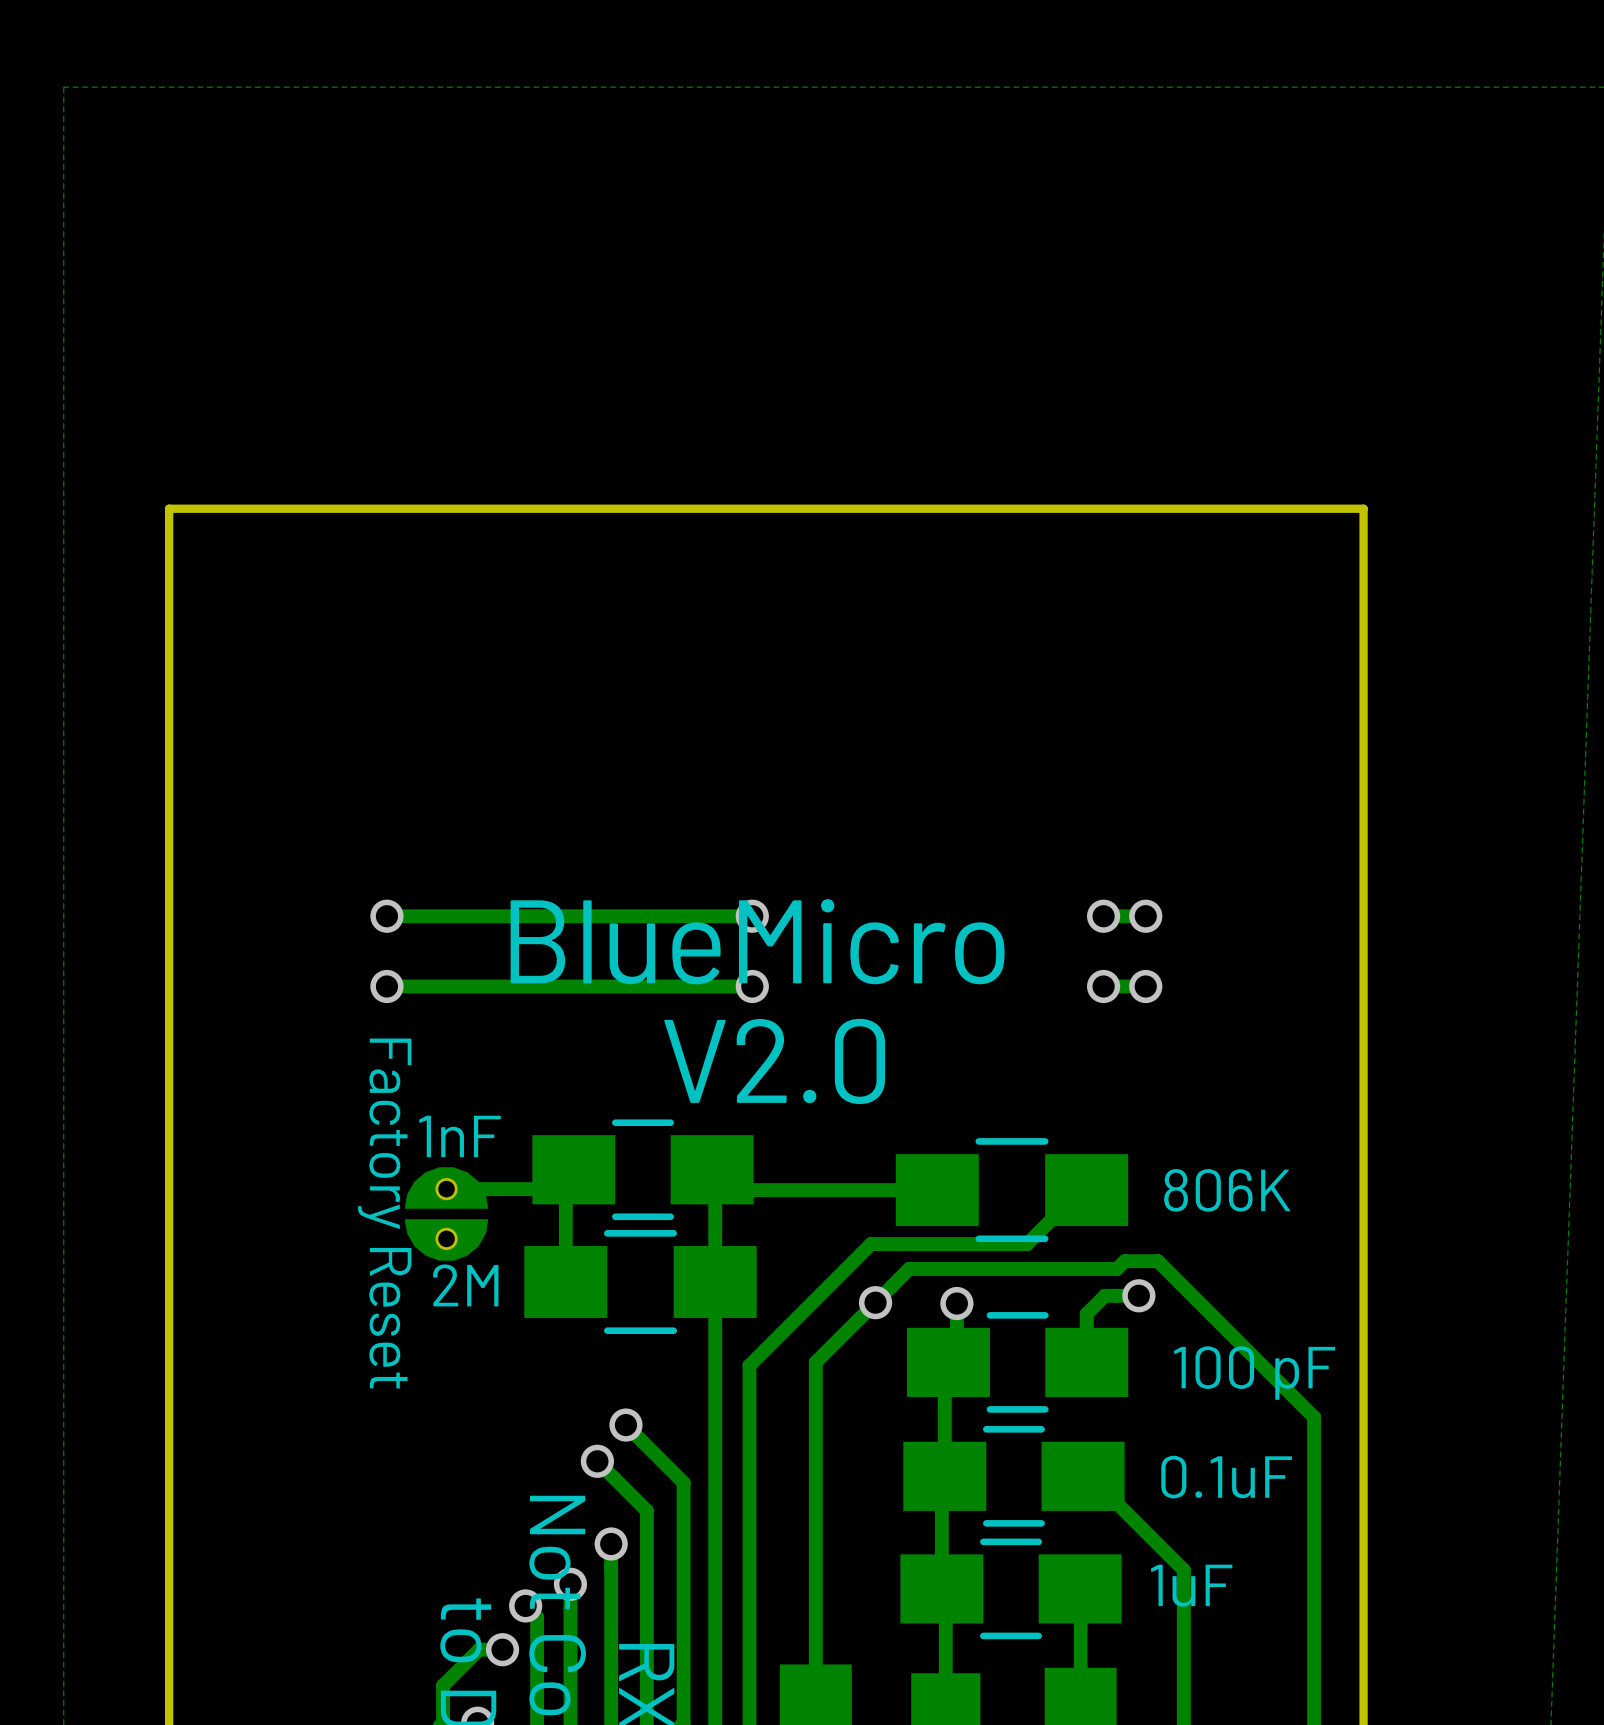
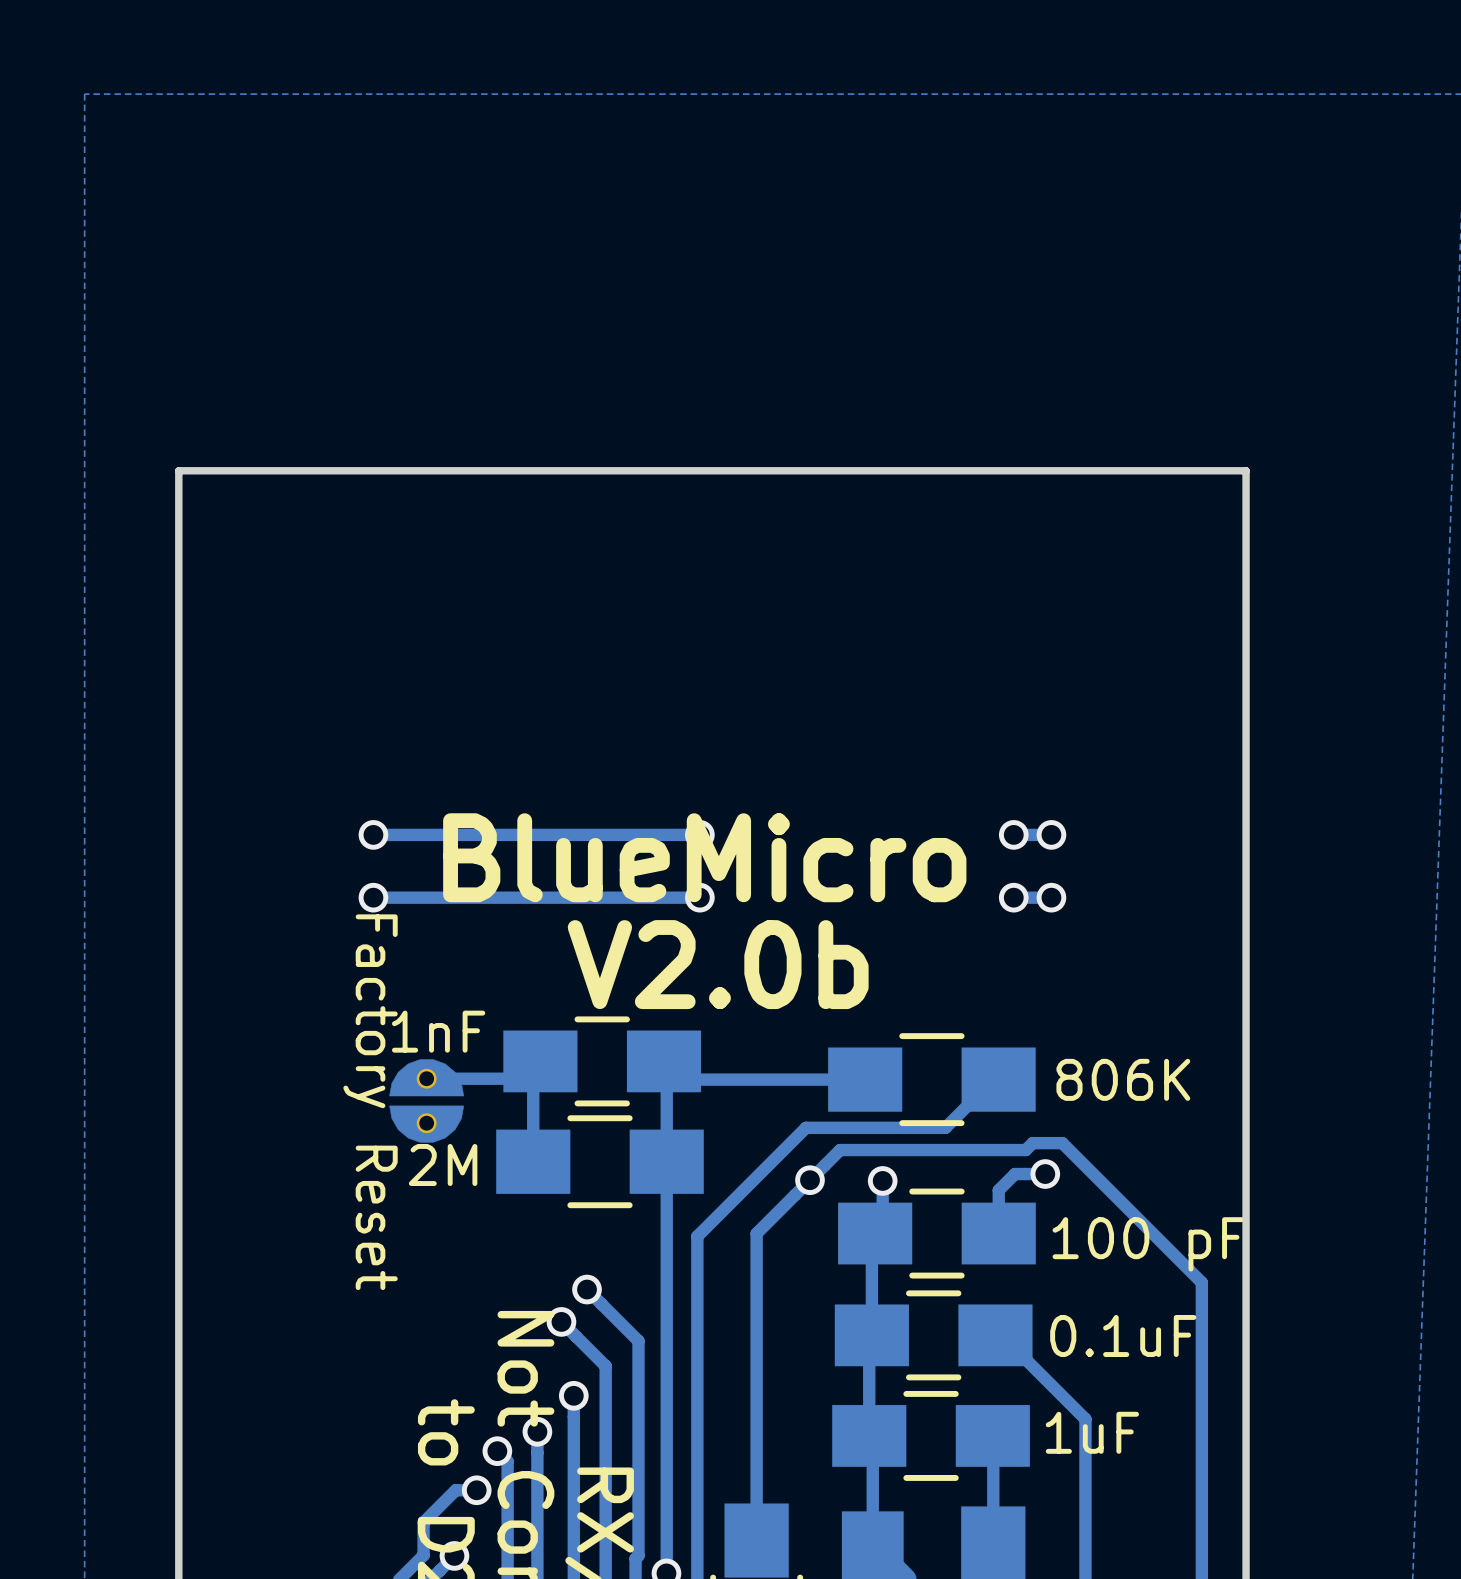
text: V2.0 (774, 1061) -> V2.0b (718, 964)

